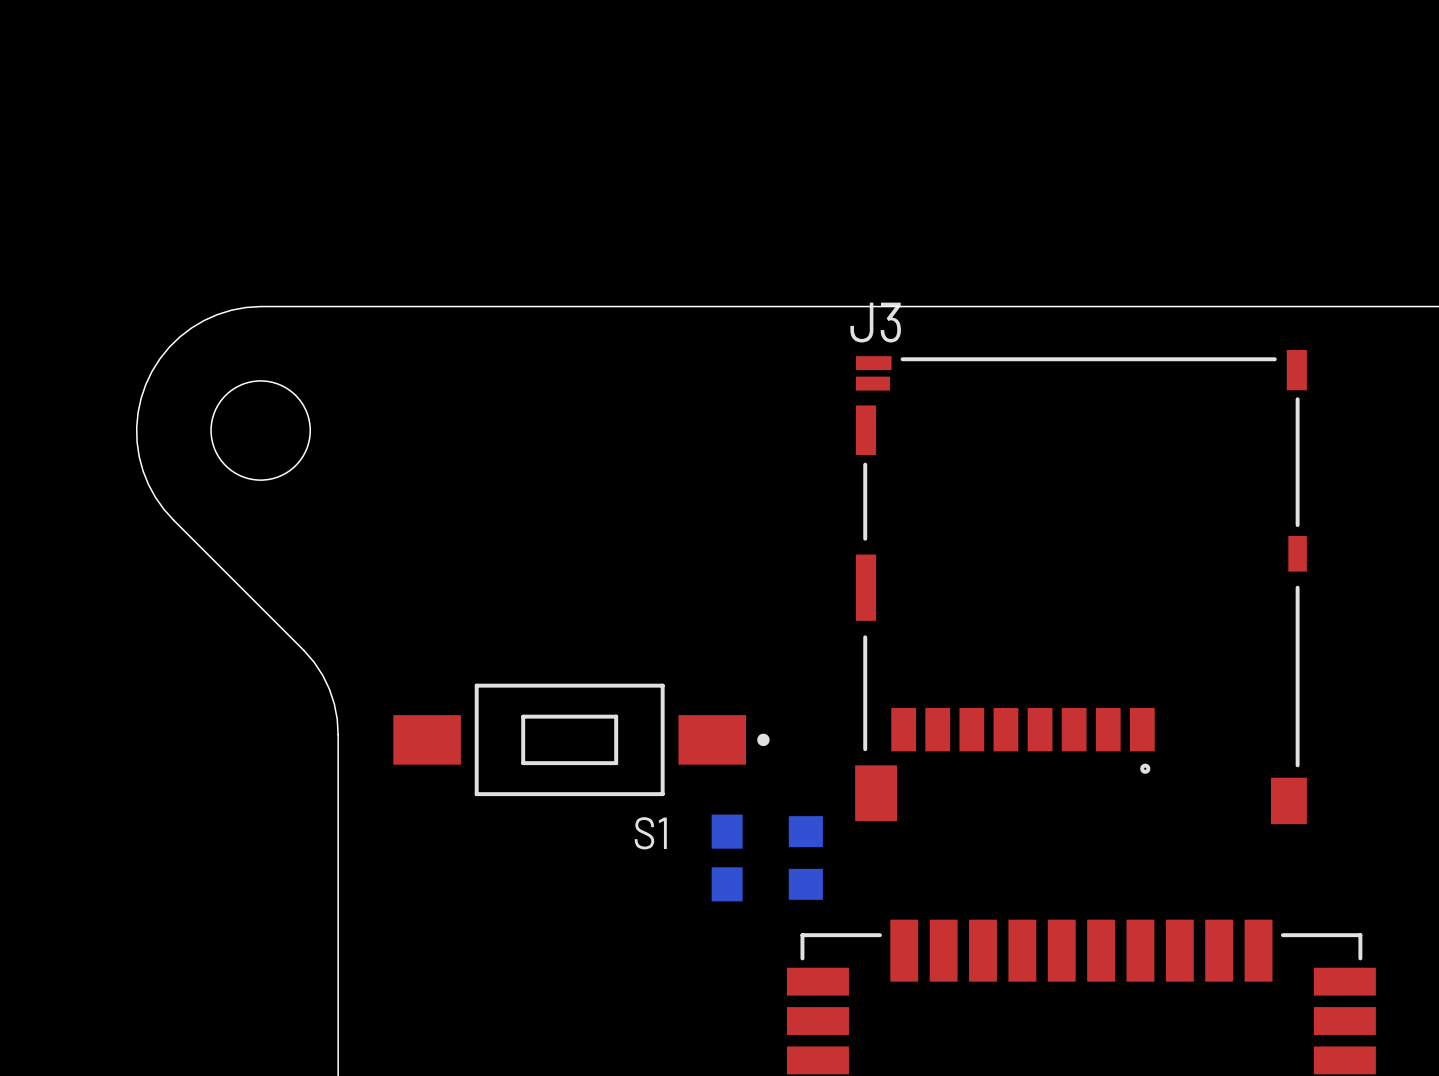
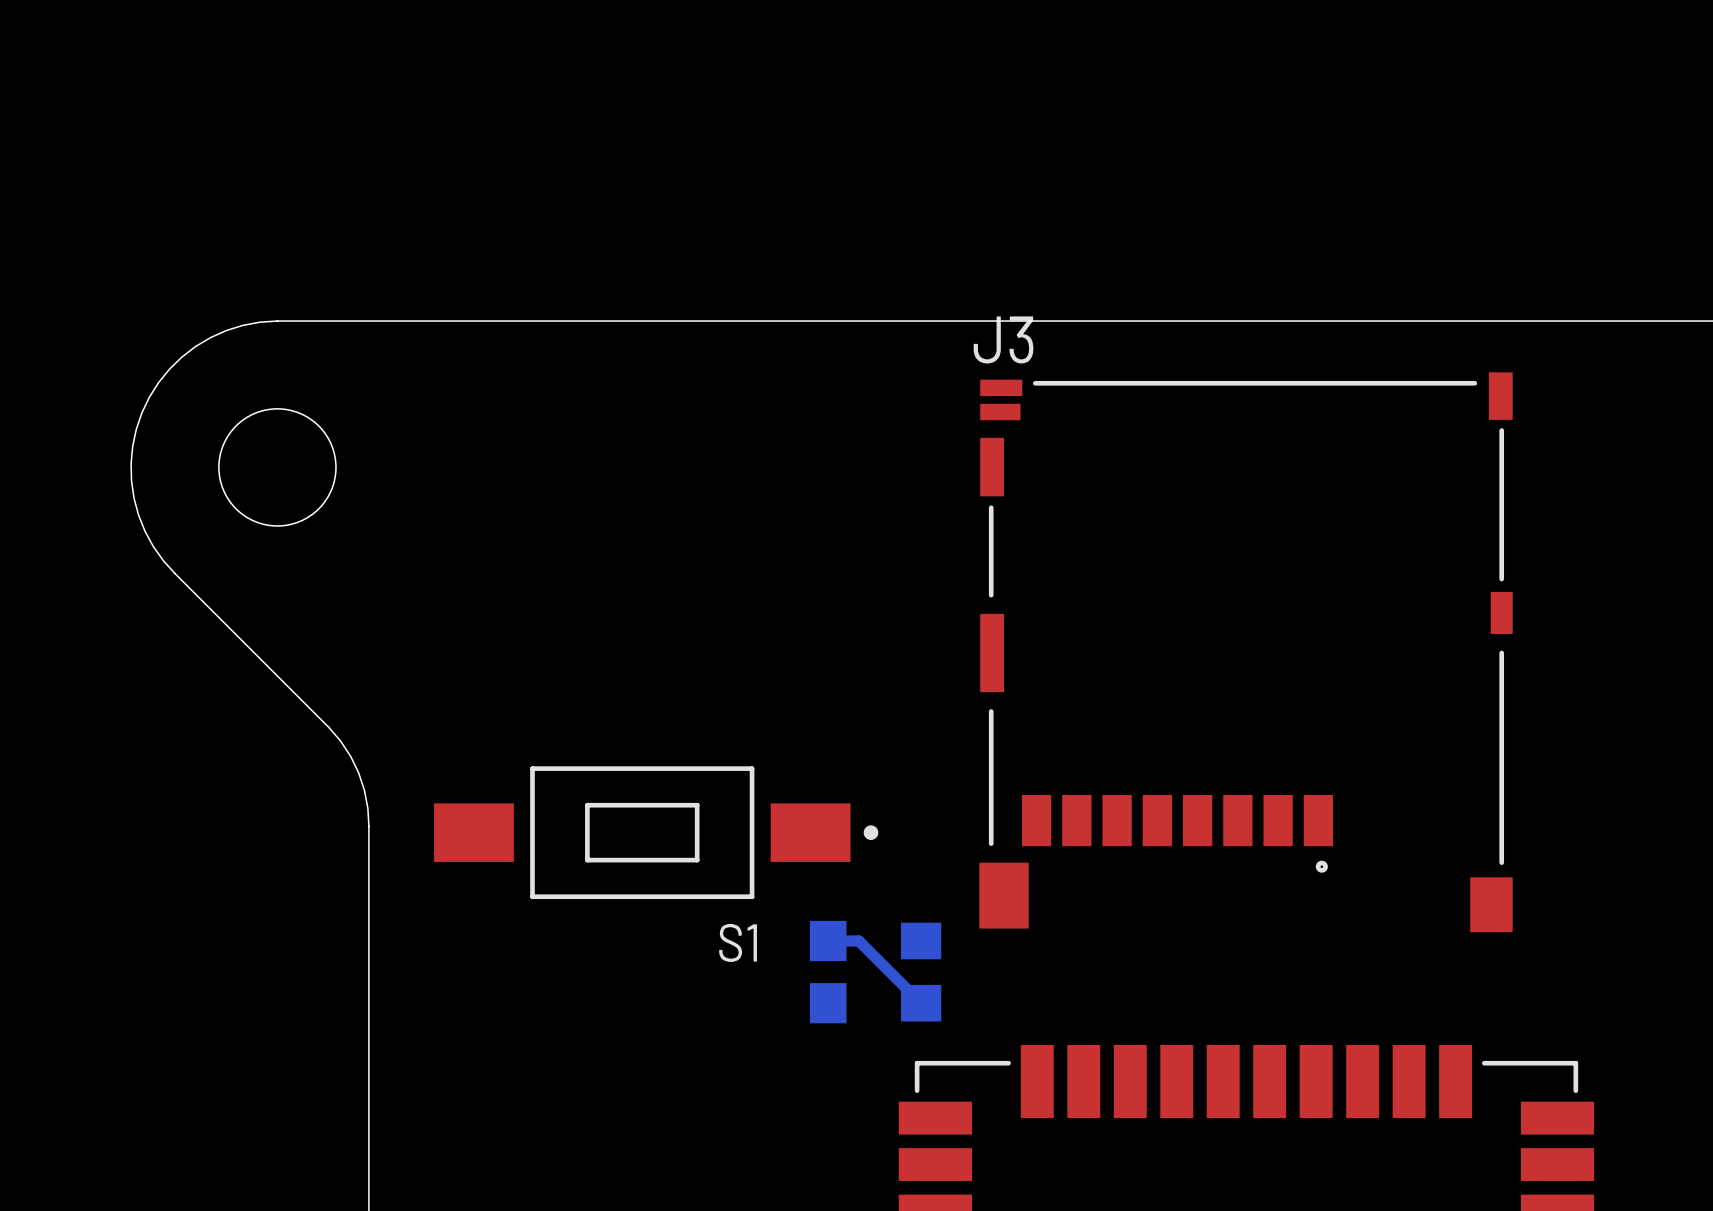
bottom track: none -> (828, 940) (858, 940) (921, 1003)

